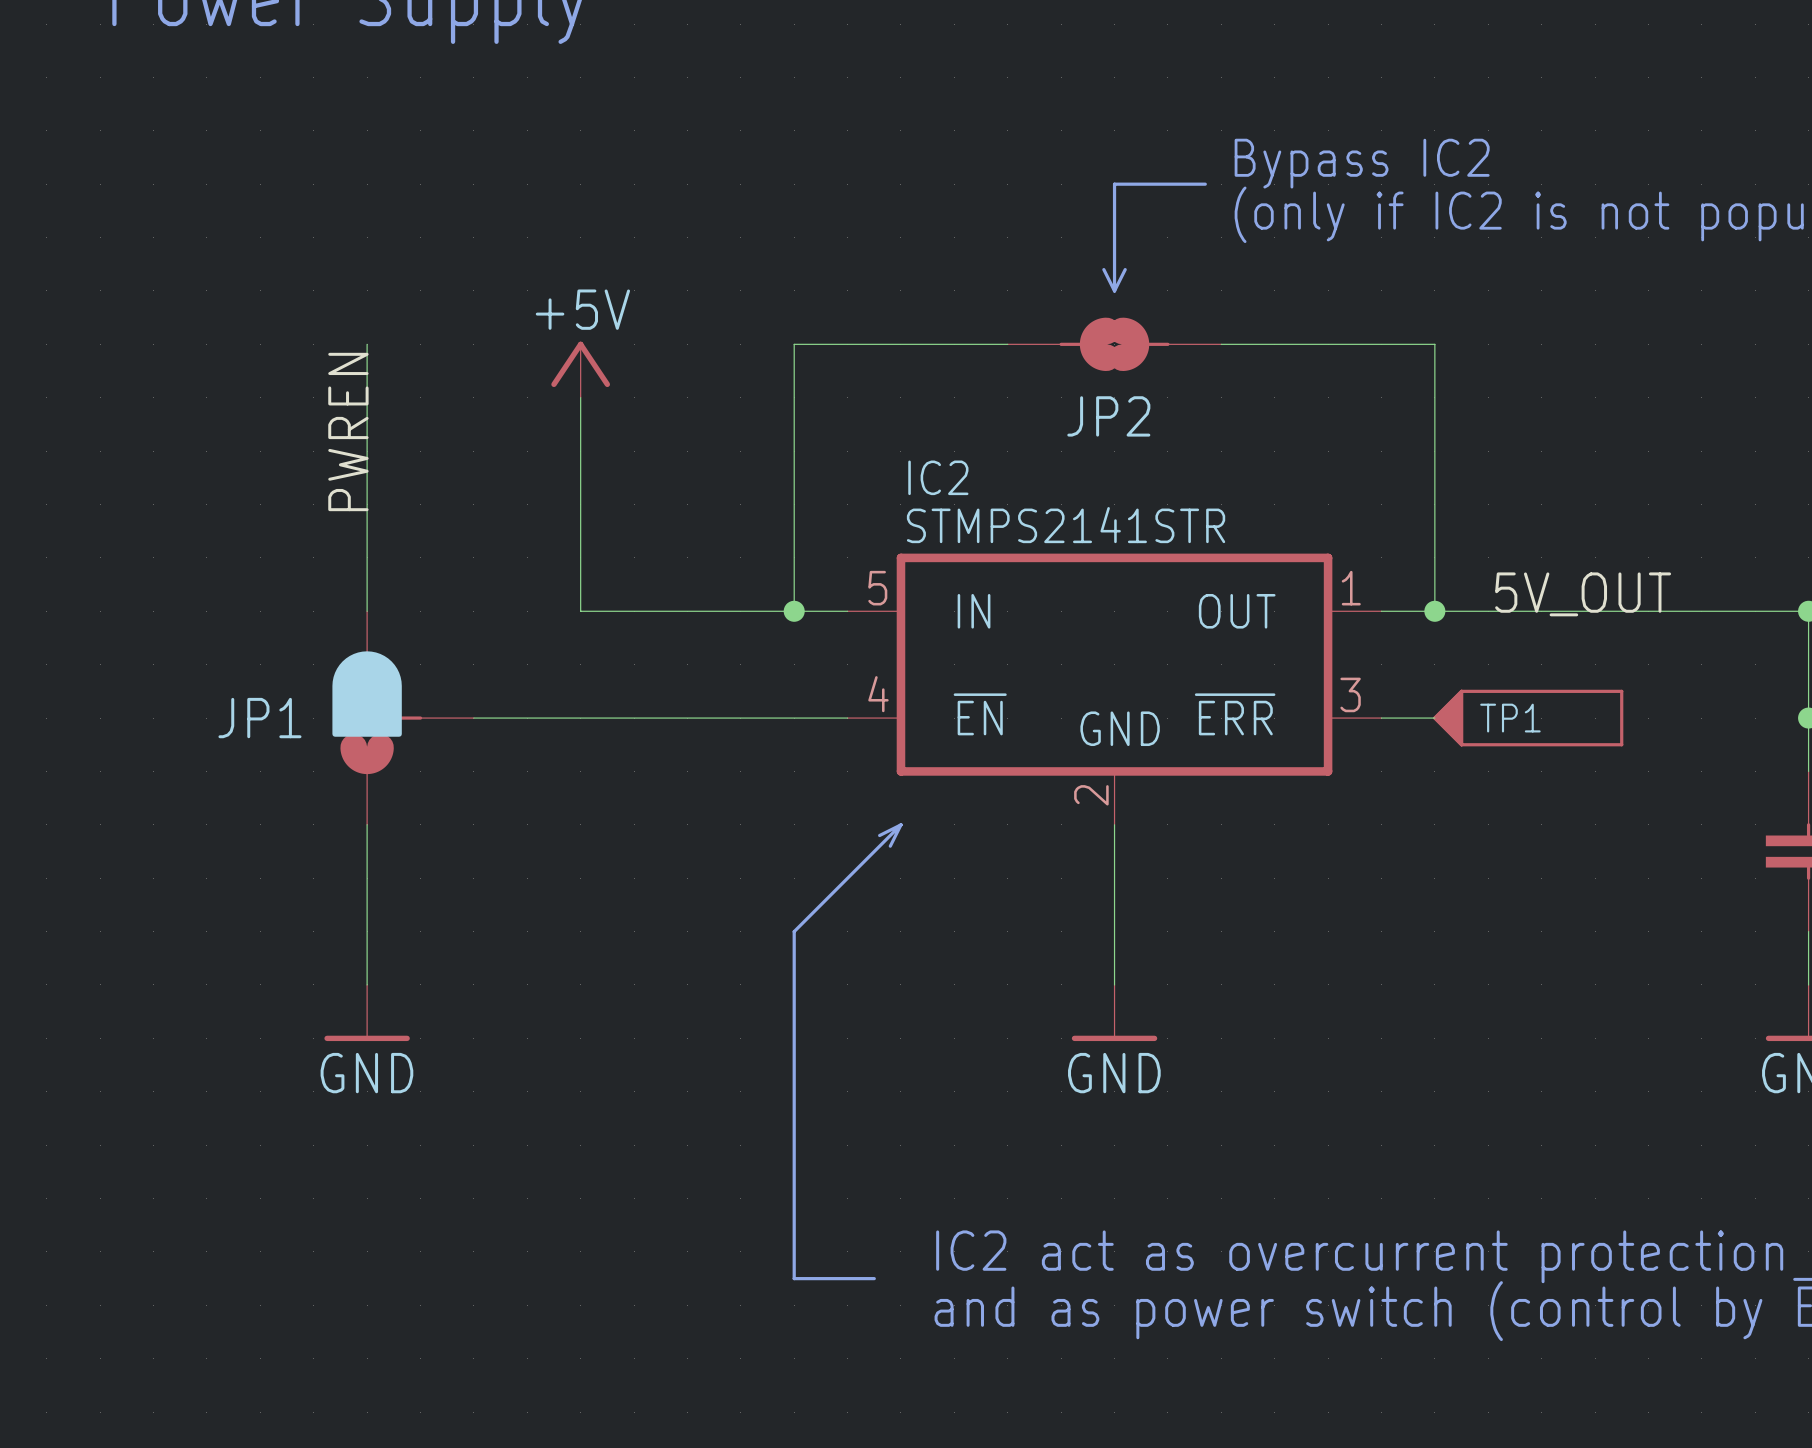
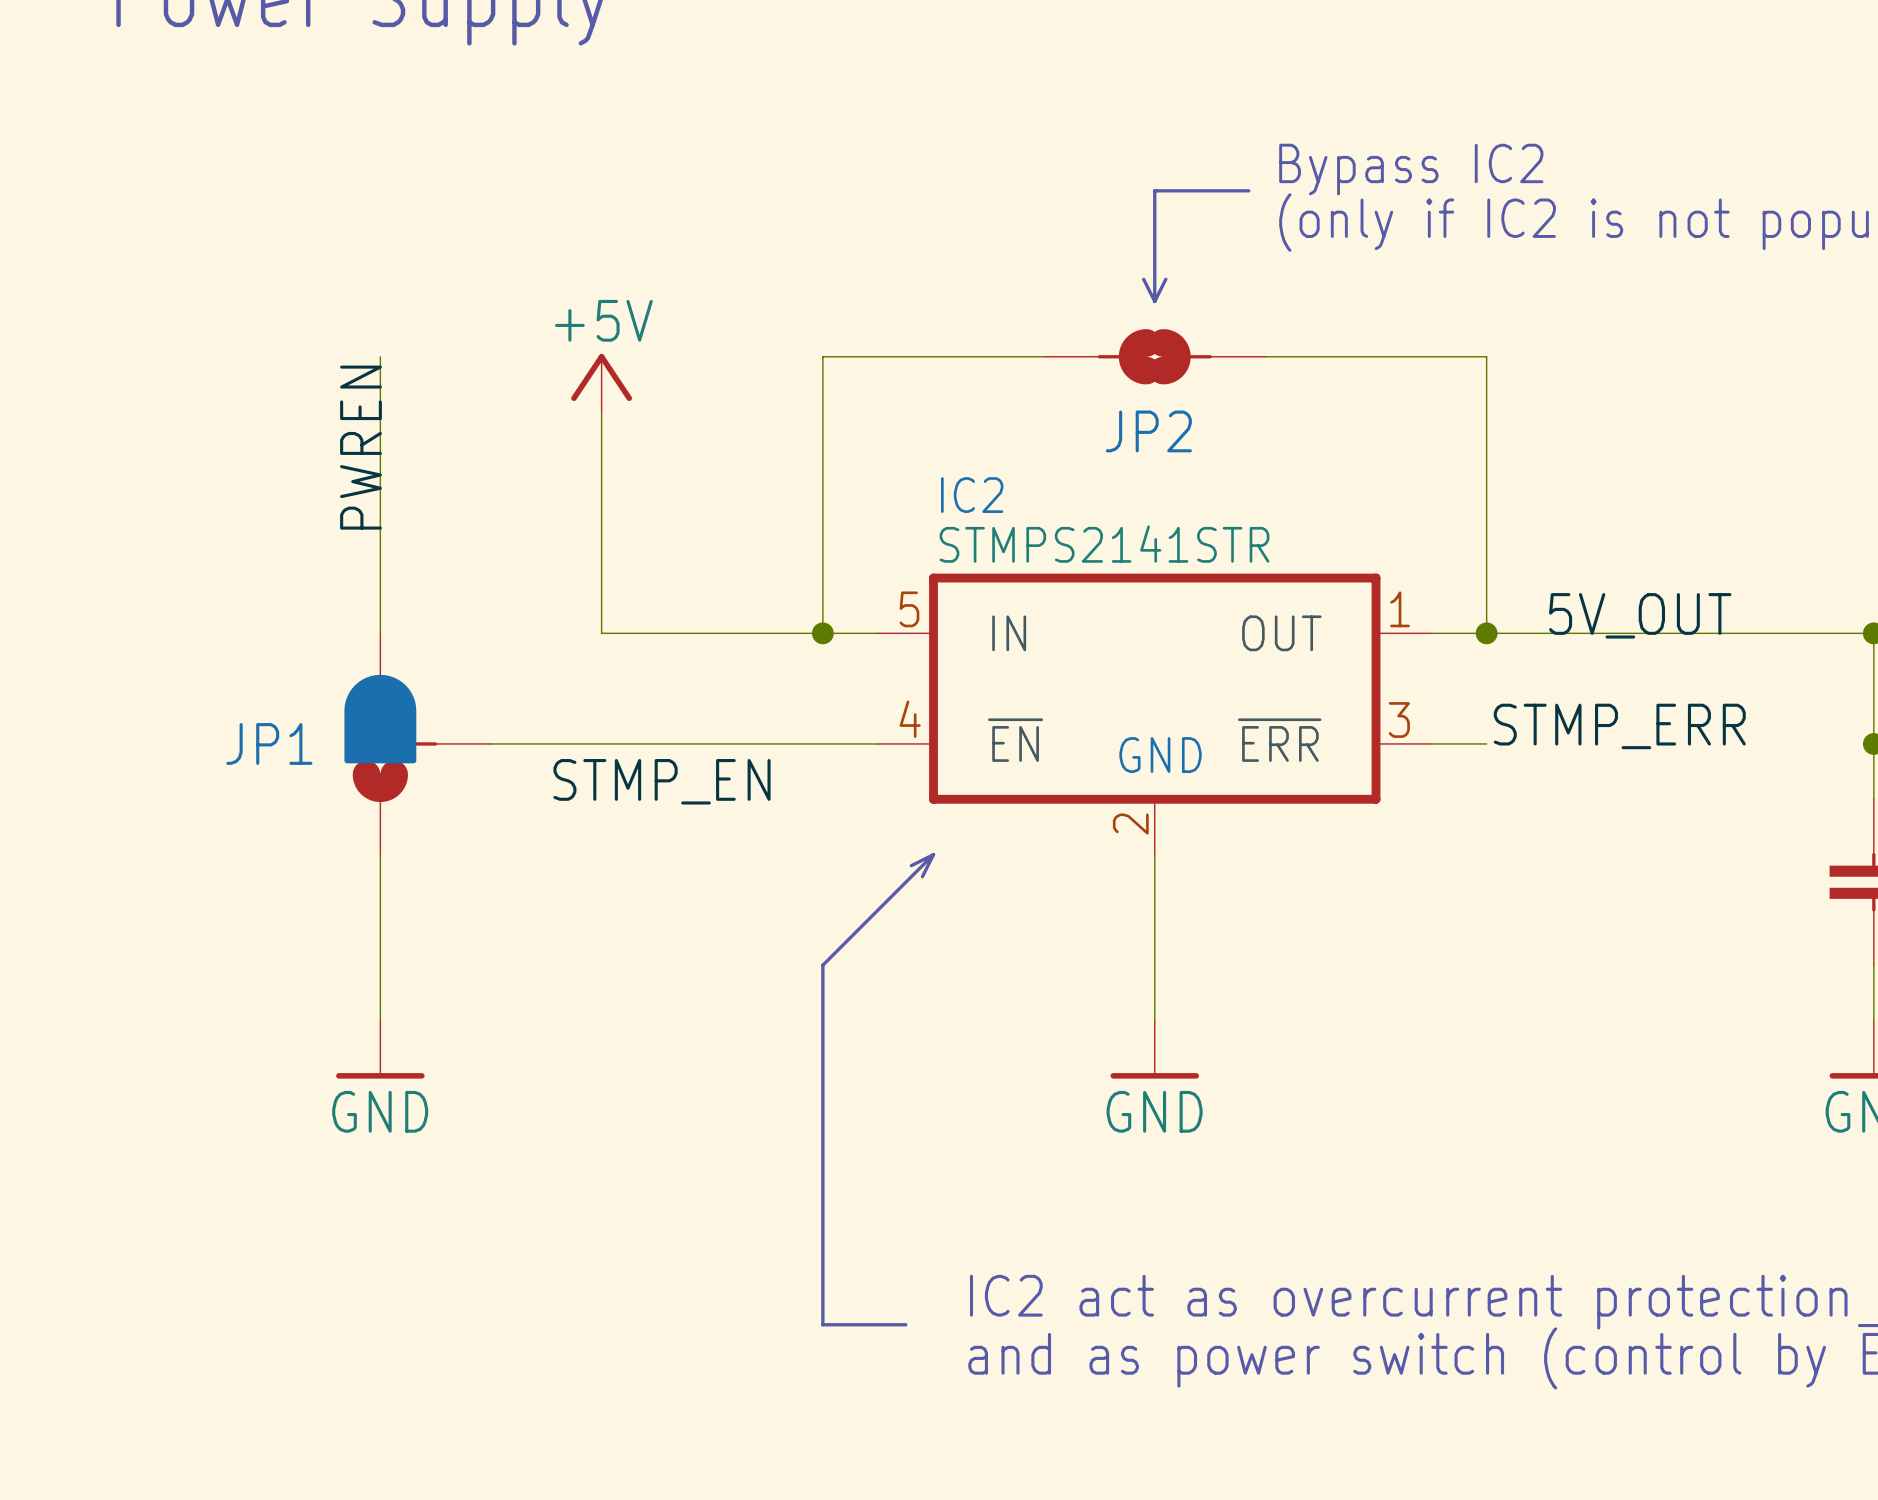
label: none -> STMP_ERR (1619, 726)
TP1: (1528, 718) -> none
label: none -> STMP_EN (662, 781)

